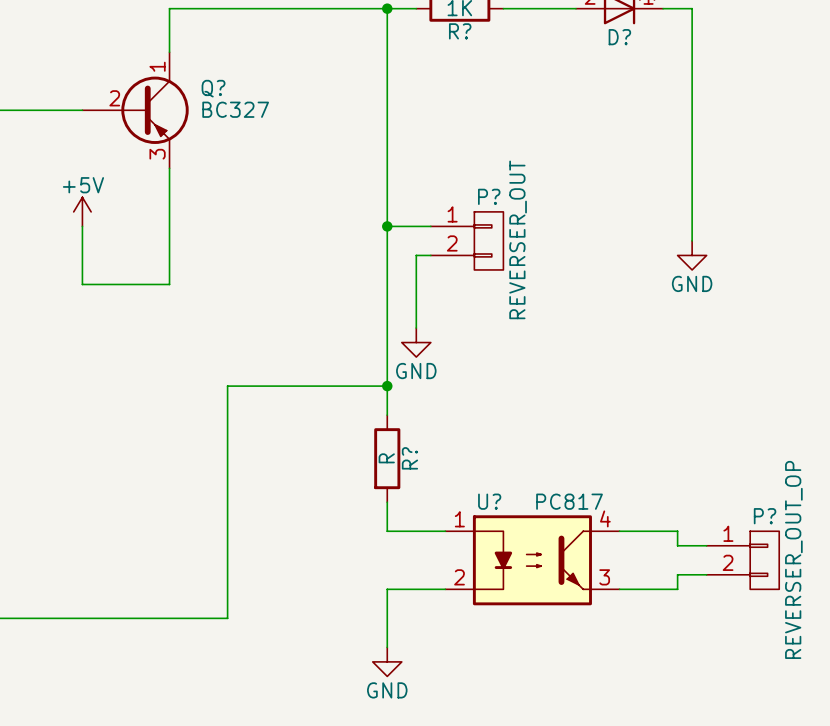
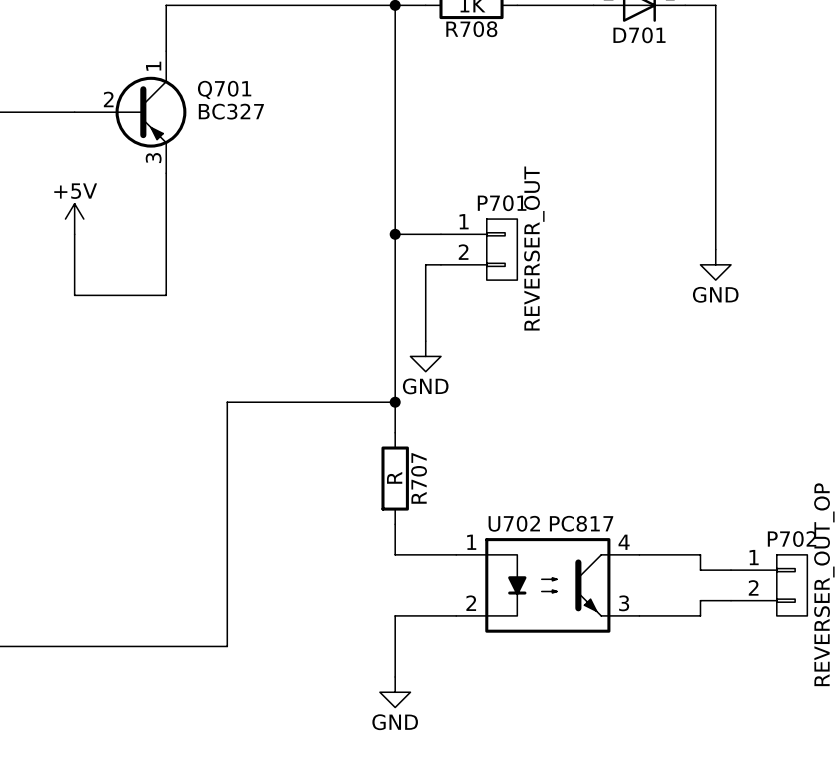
R? name: R? (460, 31) -> R708 (471, 29)
D? name: D? (619, 37) -> D701 (639, 35)
Q? name: Q? (213, 88) -> Q701 (224, 89)
P? name: P? (489, 196) -> P701 (502, 203)
R? name: R? (409, 458) -> R707 (419, 478)
U? name: U? (489, 501) -> U702 (514, 523)
P? name: P? (765, 516) -> P702 (792, 539)

